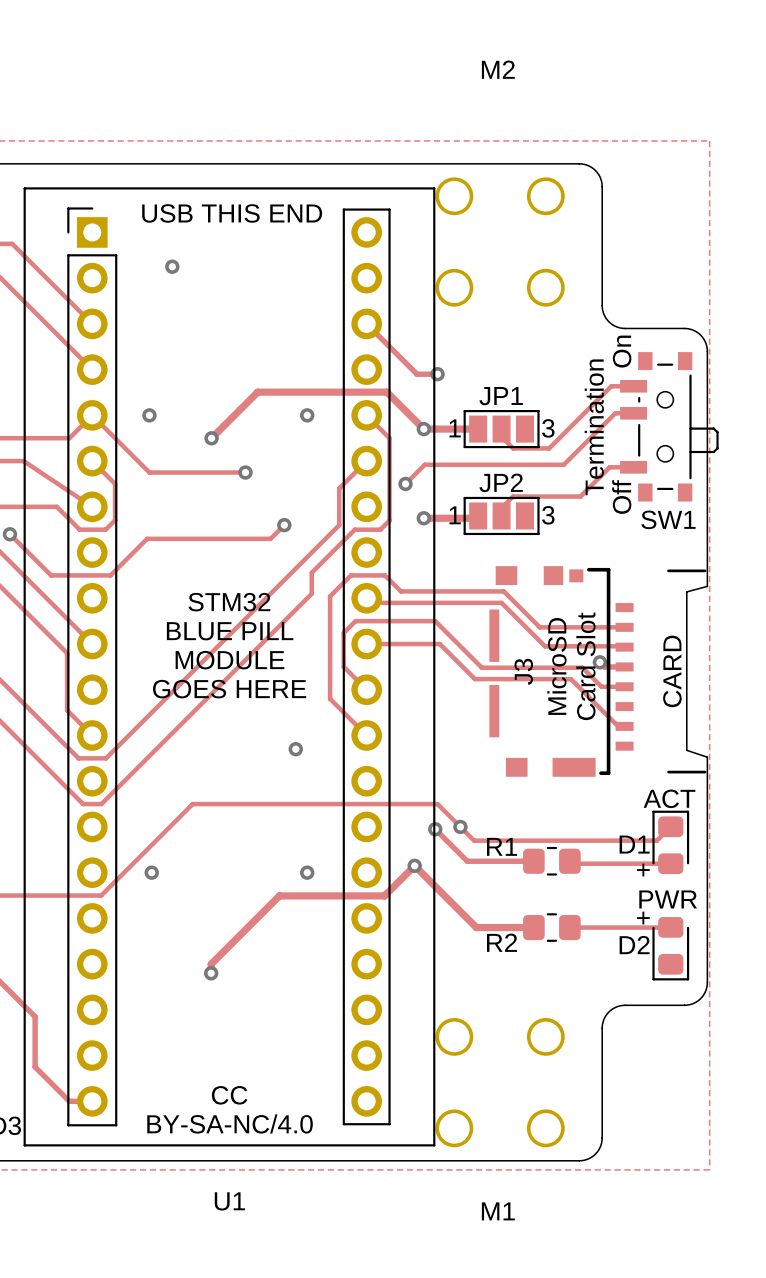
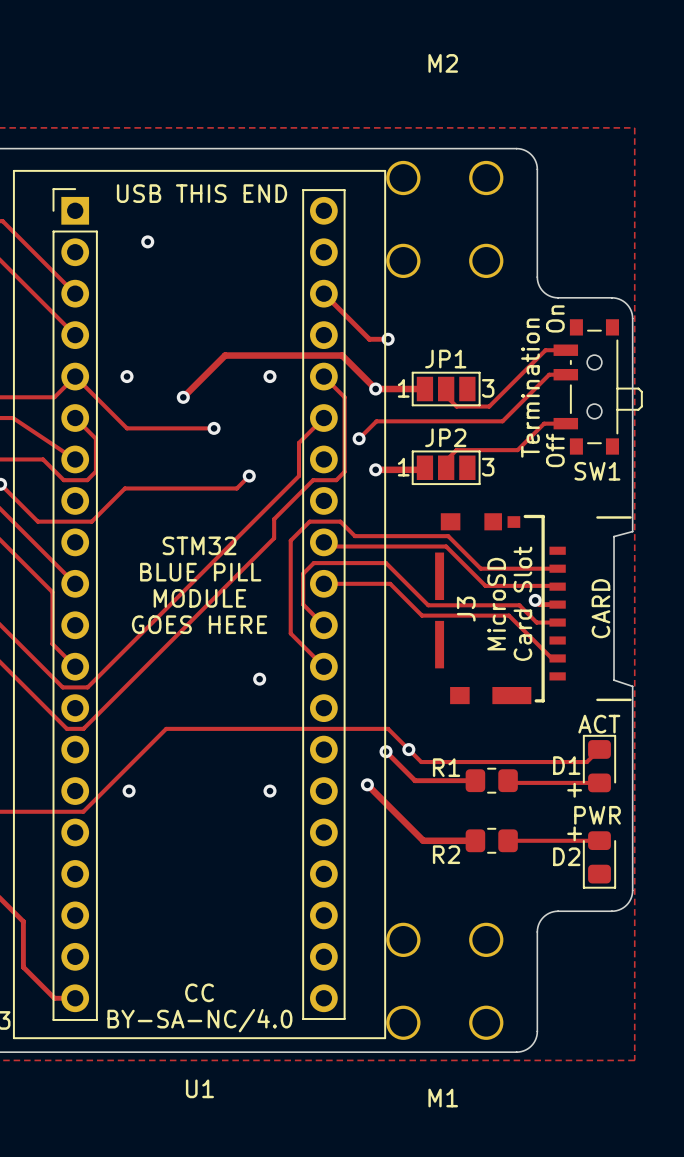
track: (414, 865) (384, 895) (279, 895) (211, 964) (211, 973) -> none
via: (211, 973) -> none

